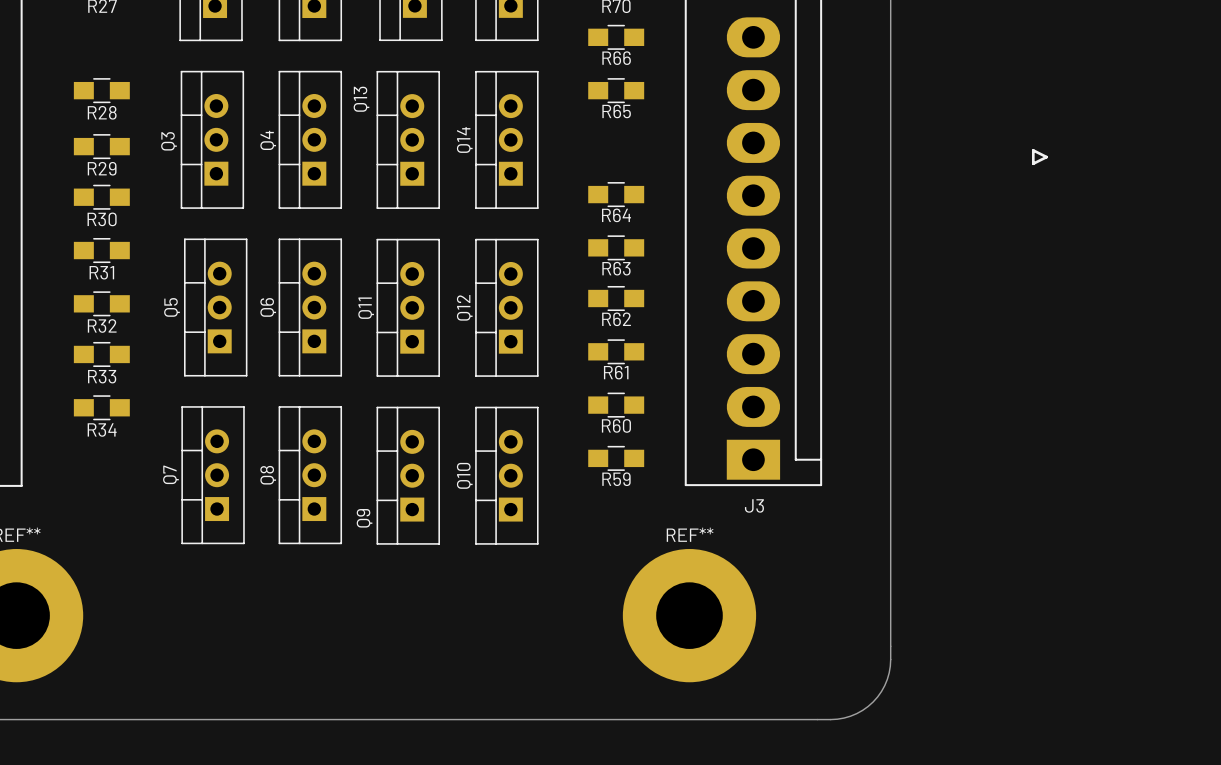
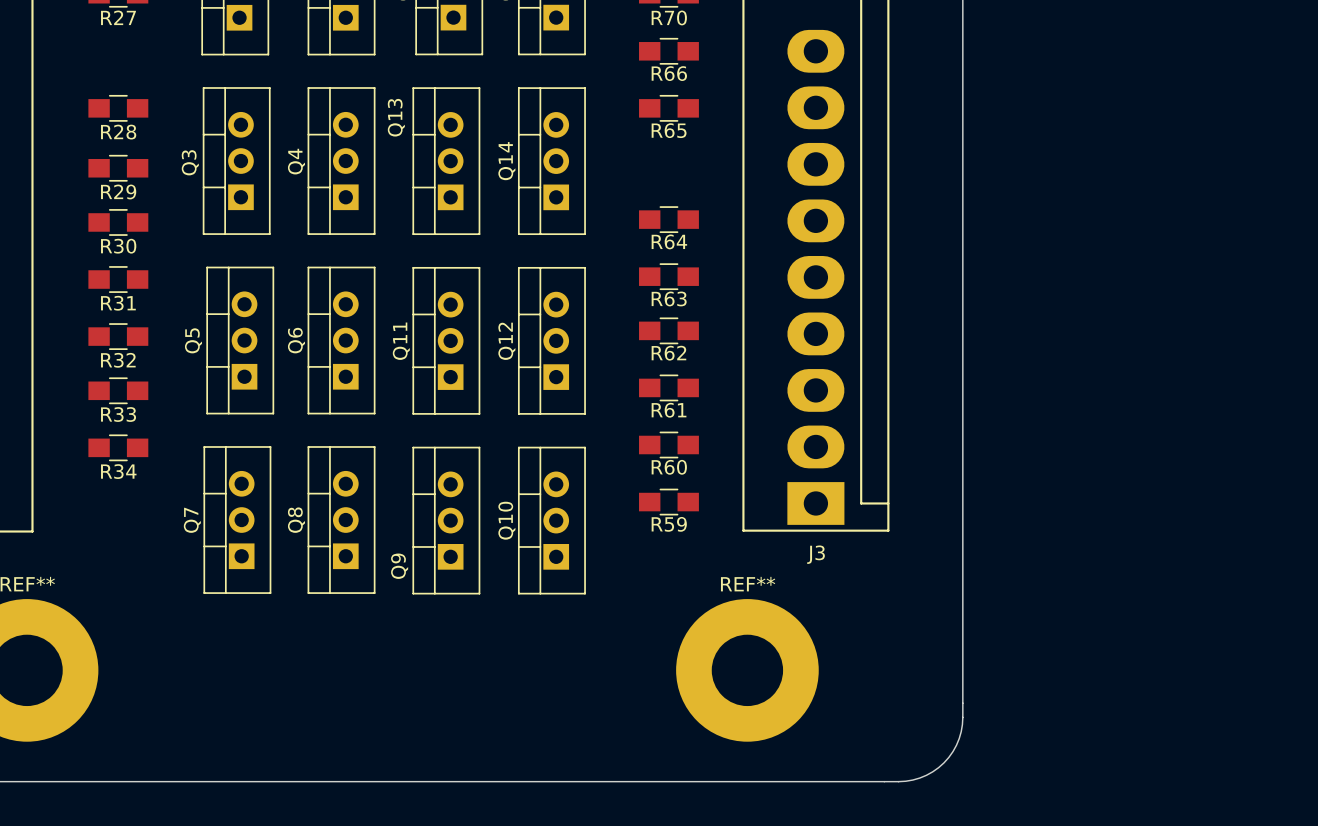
line: (1033, 150) (1033, 163) (1046, 157) (1033, 150) -> none

